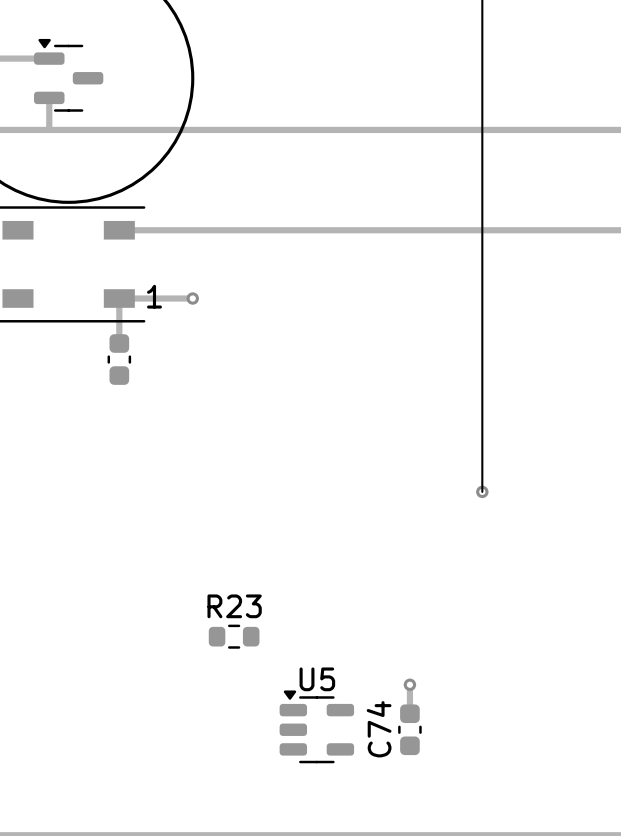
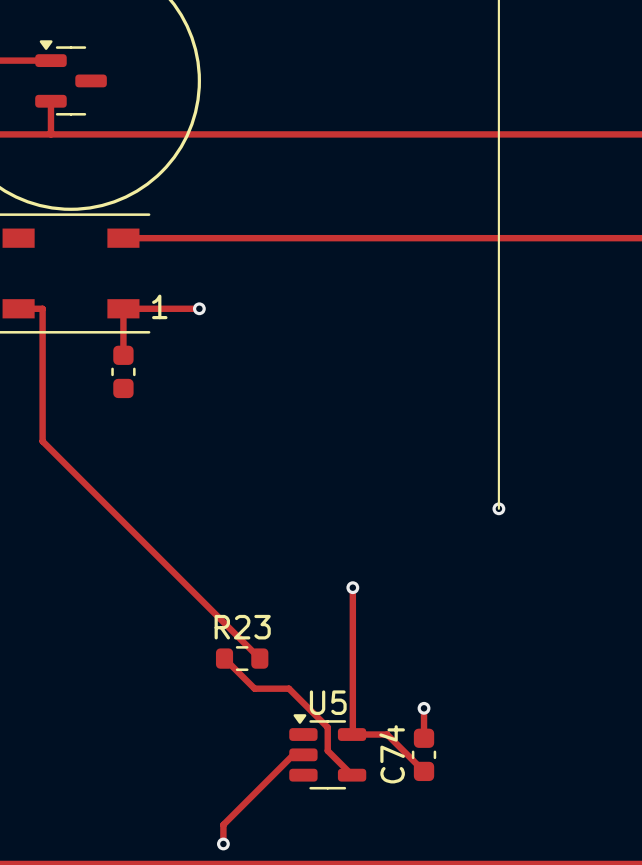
track: none -> (18, 308) (42, 308) (42, 441) (259, 658)
track: none -> (352, 587) (352, 734)
via: none -> (352, 587)
track: none -> (224, 658) (254, 688) (288, 688) (327, 727) (327, 750) (352, 775)
track: none -> (352, 734) (387, 734) (424, 771)
track: none -> (303, 754) (293, 754) (223, 824) (223, 843)
via: none -> (223, 843)

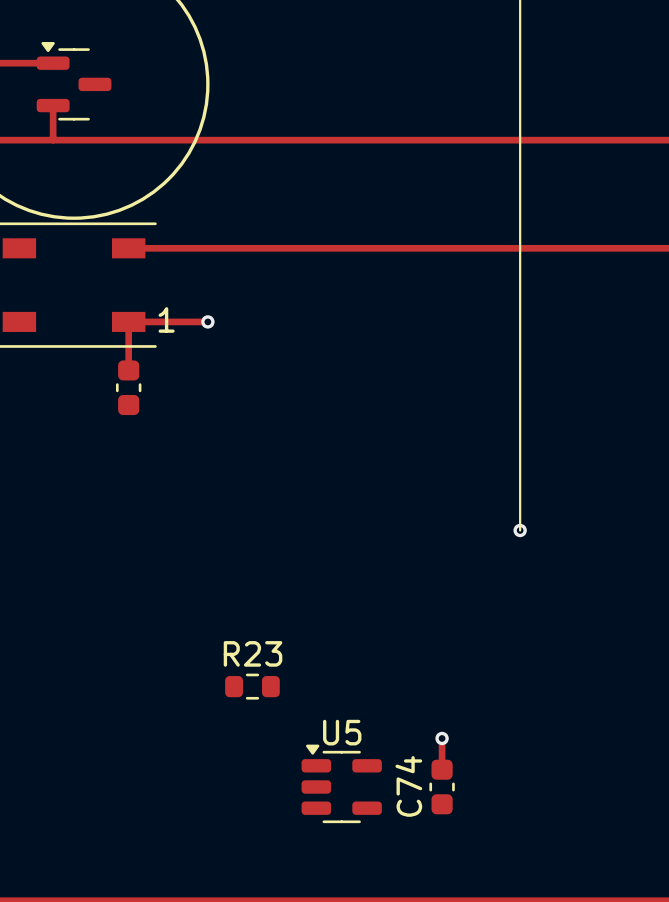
track: (18, 308) (42, 308) (42, 441) (259, 658) -> none
track: (352, 587) (352, 734) -> none
via: (352, 587) -> none
track: (224, 658) (254, 688) (288, 688) (327, 727) (327, 750) (352, 775) -> none
track: (352, 734) (387, 734) (424, 771) -> none
track: (303, 754) (293, 754) (223, 824) (223, 843) -> none
via: (223, 843) -> none

